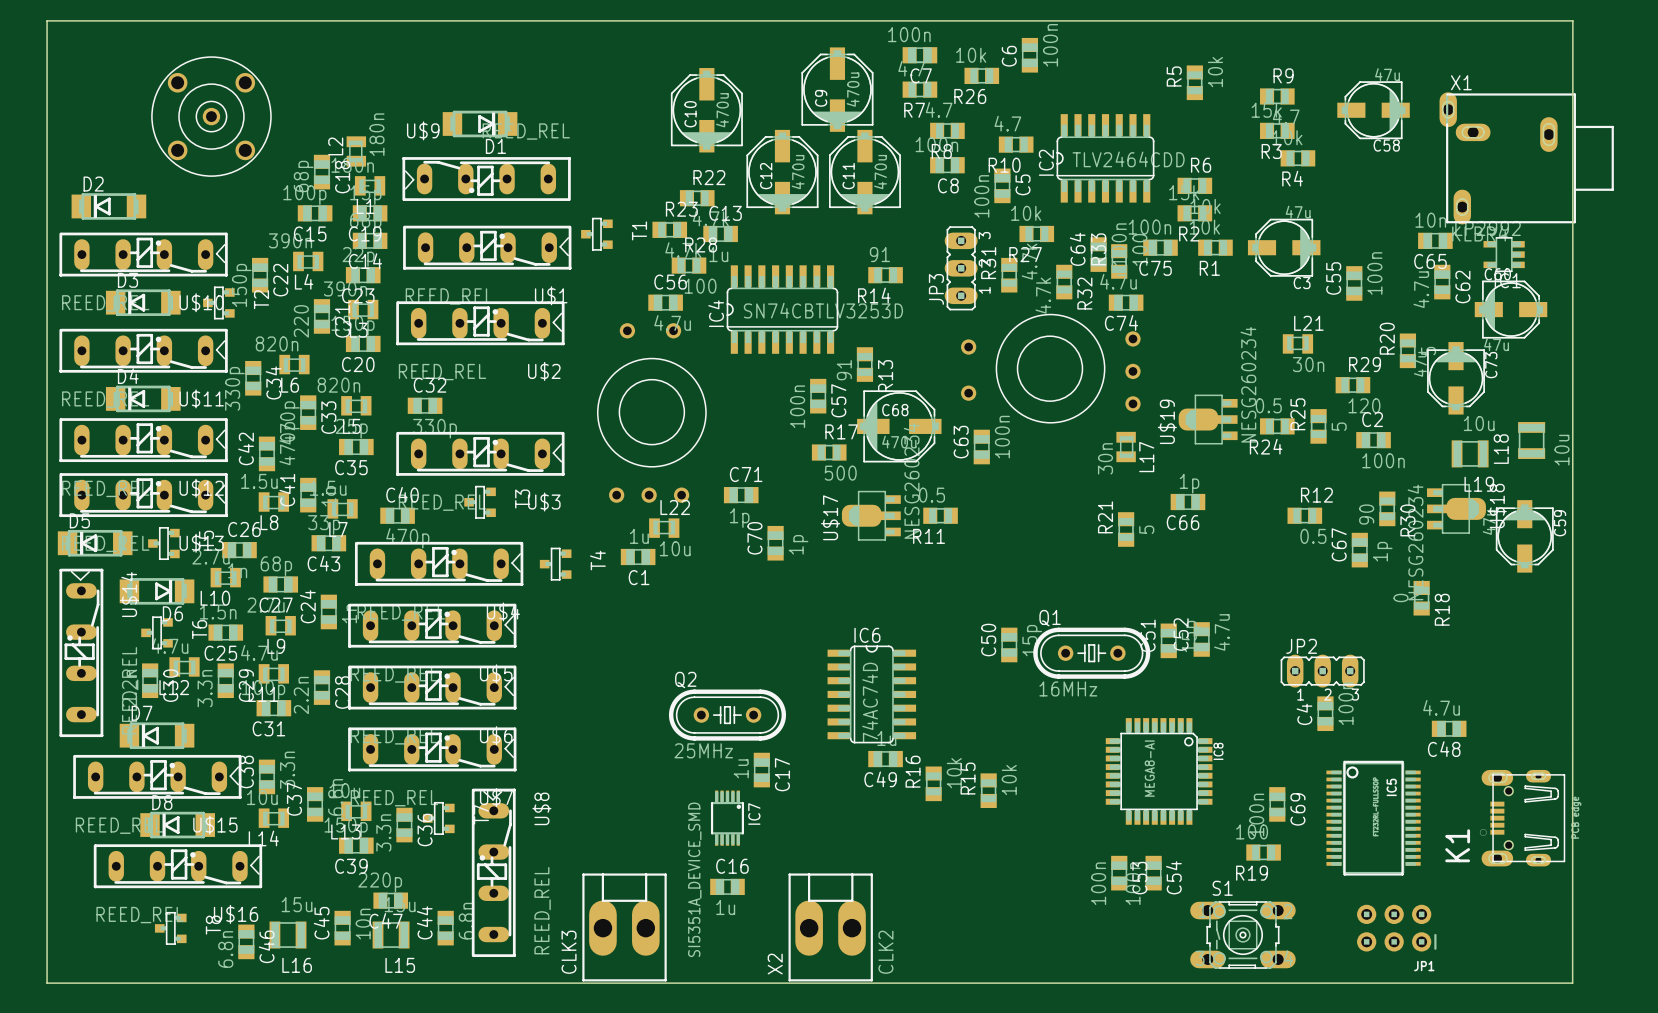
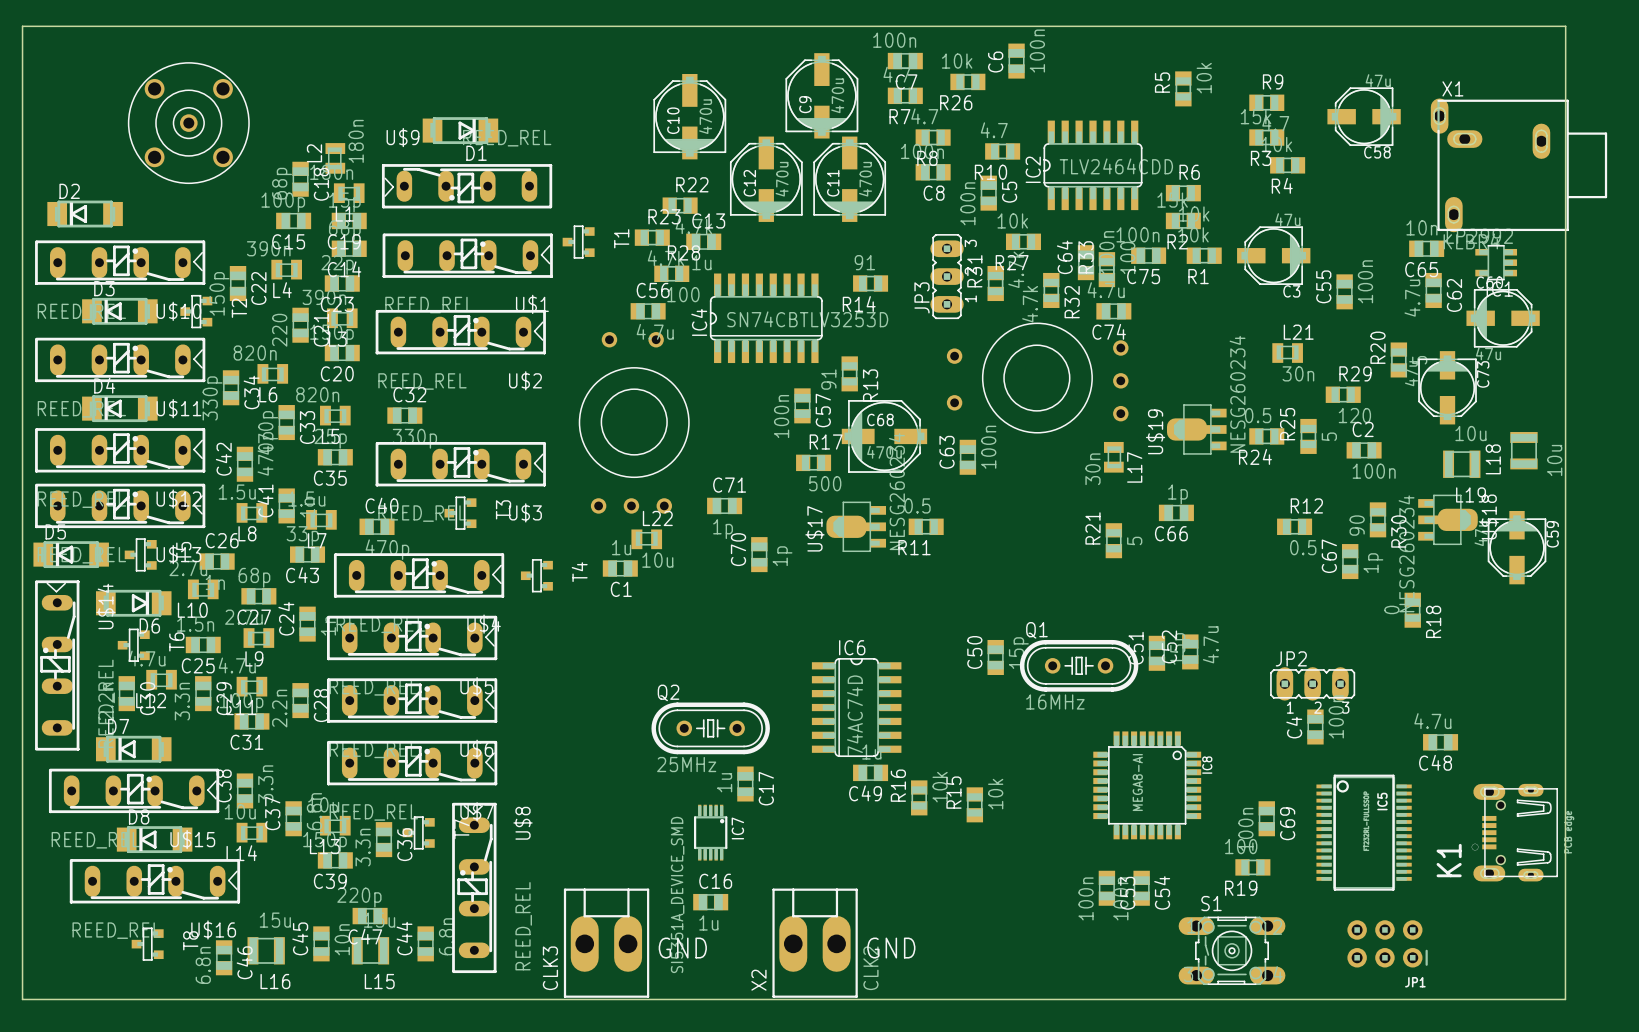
text: none -> GND (682, 948)
text: none -> GND (891, 948)

